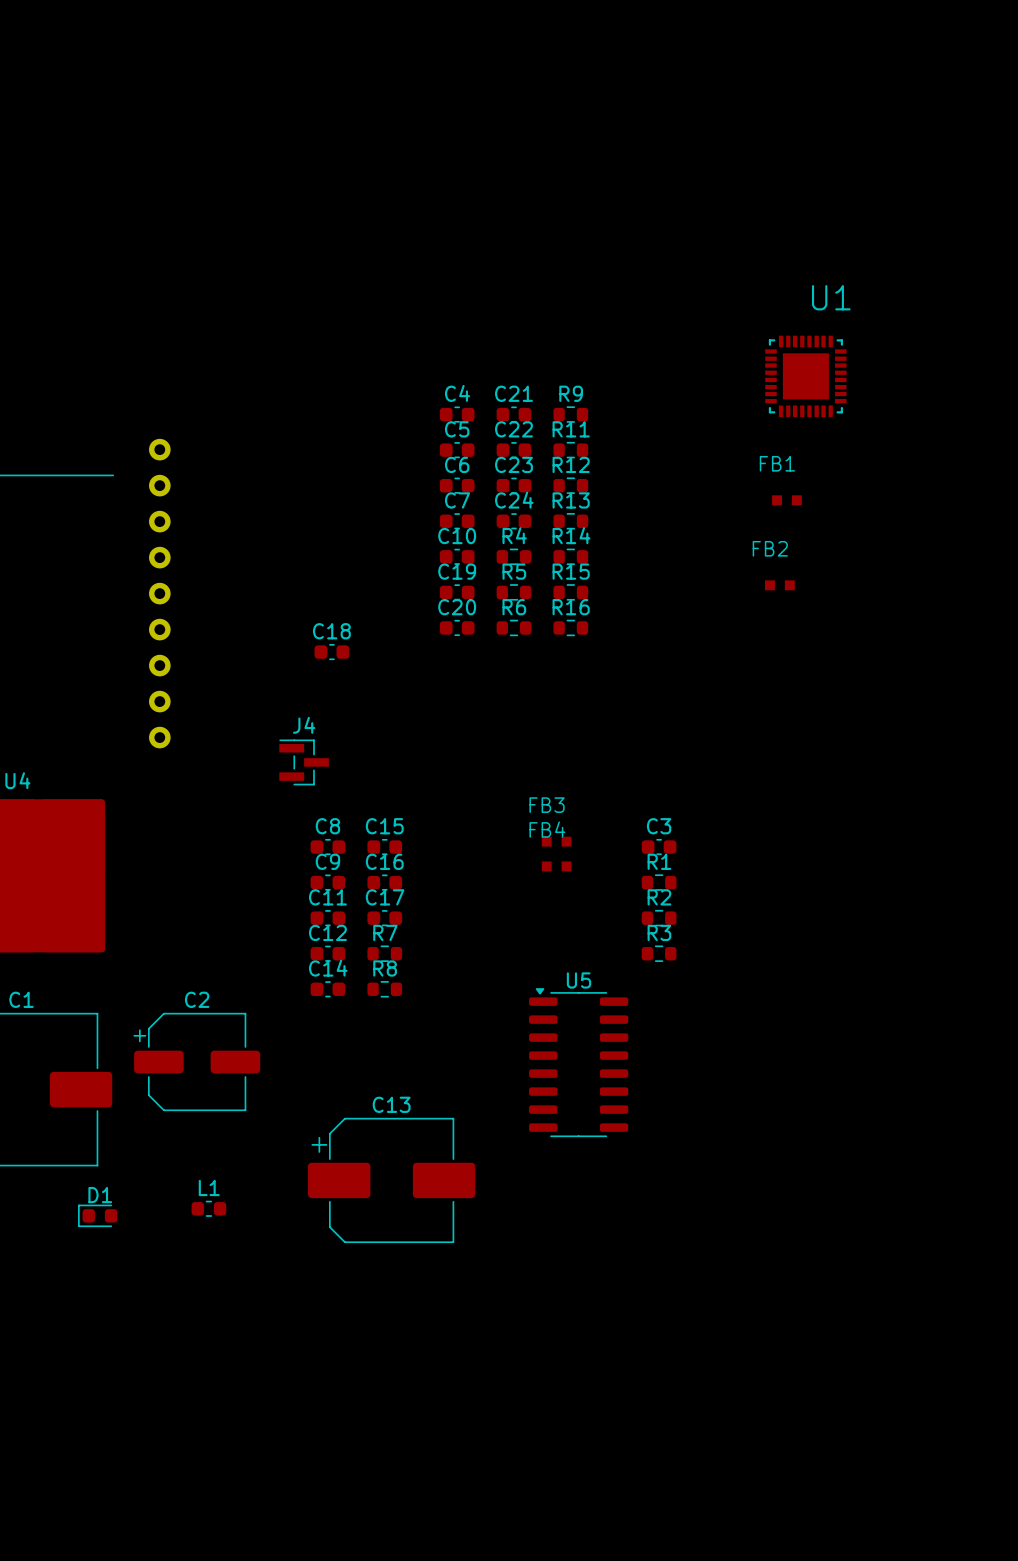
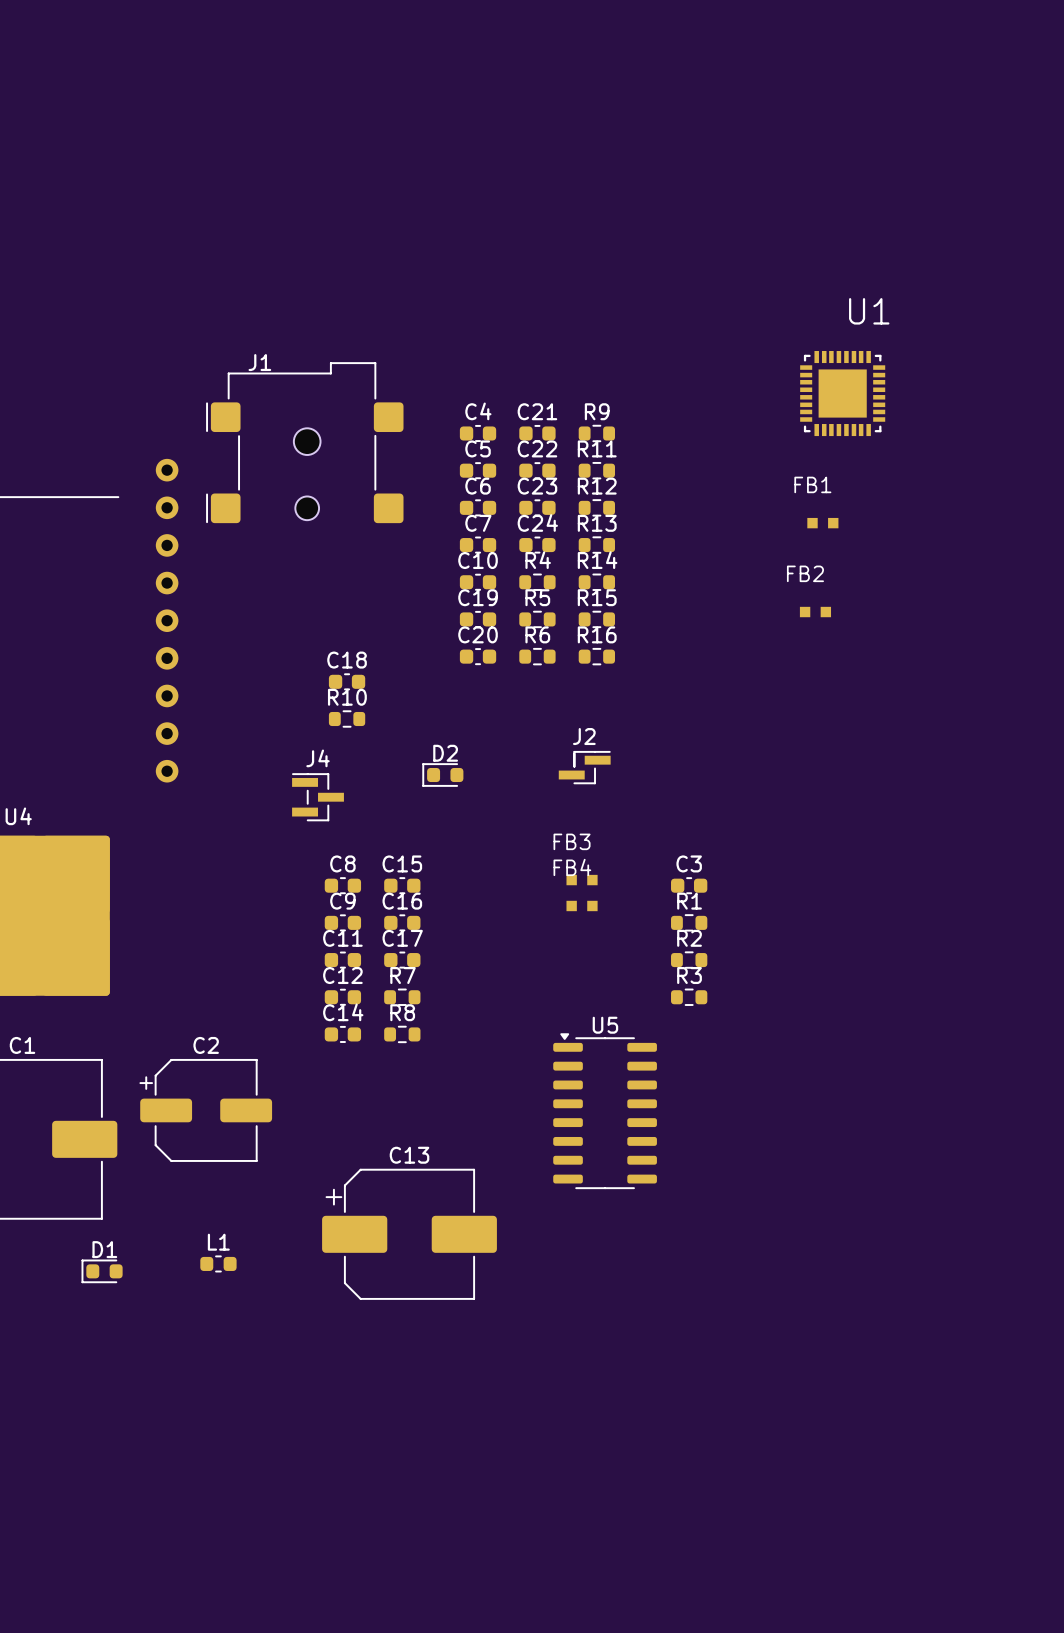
J1: none -> (304, 442)
R10: none -> (347, 719)
J2: none -> (584, 767)
D2: none -> (442, 775)

